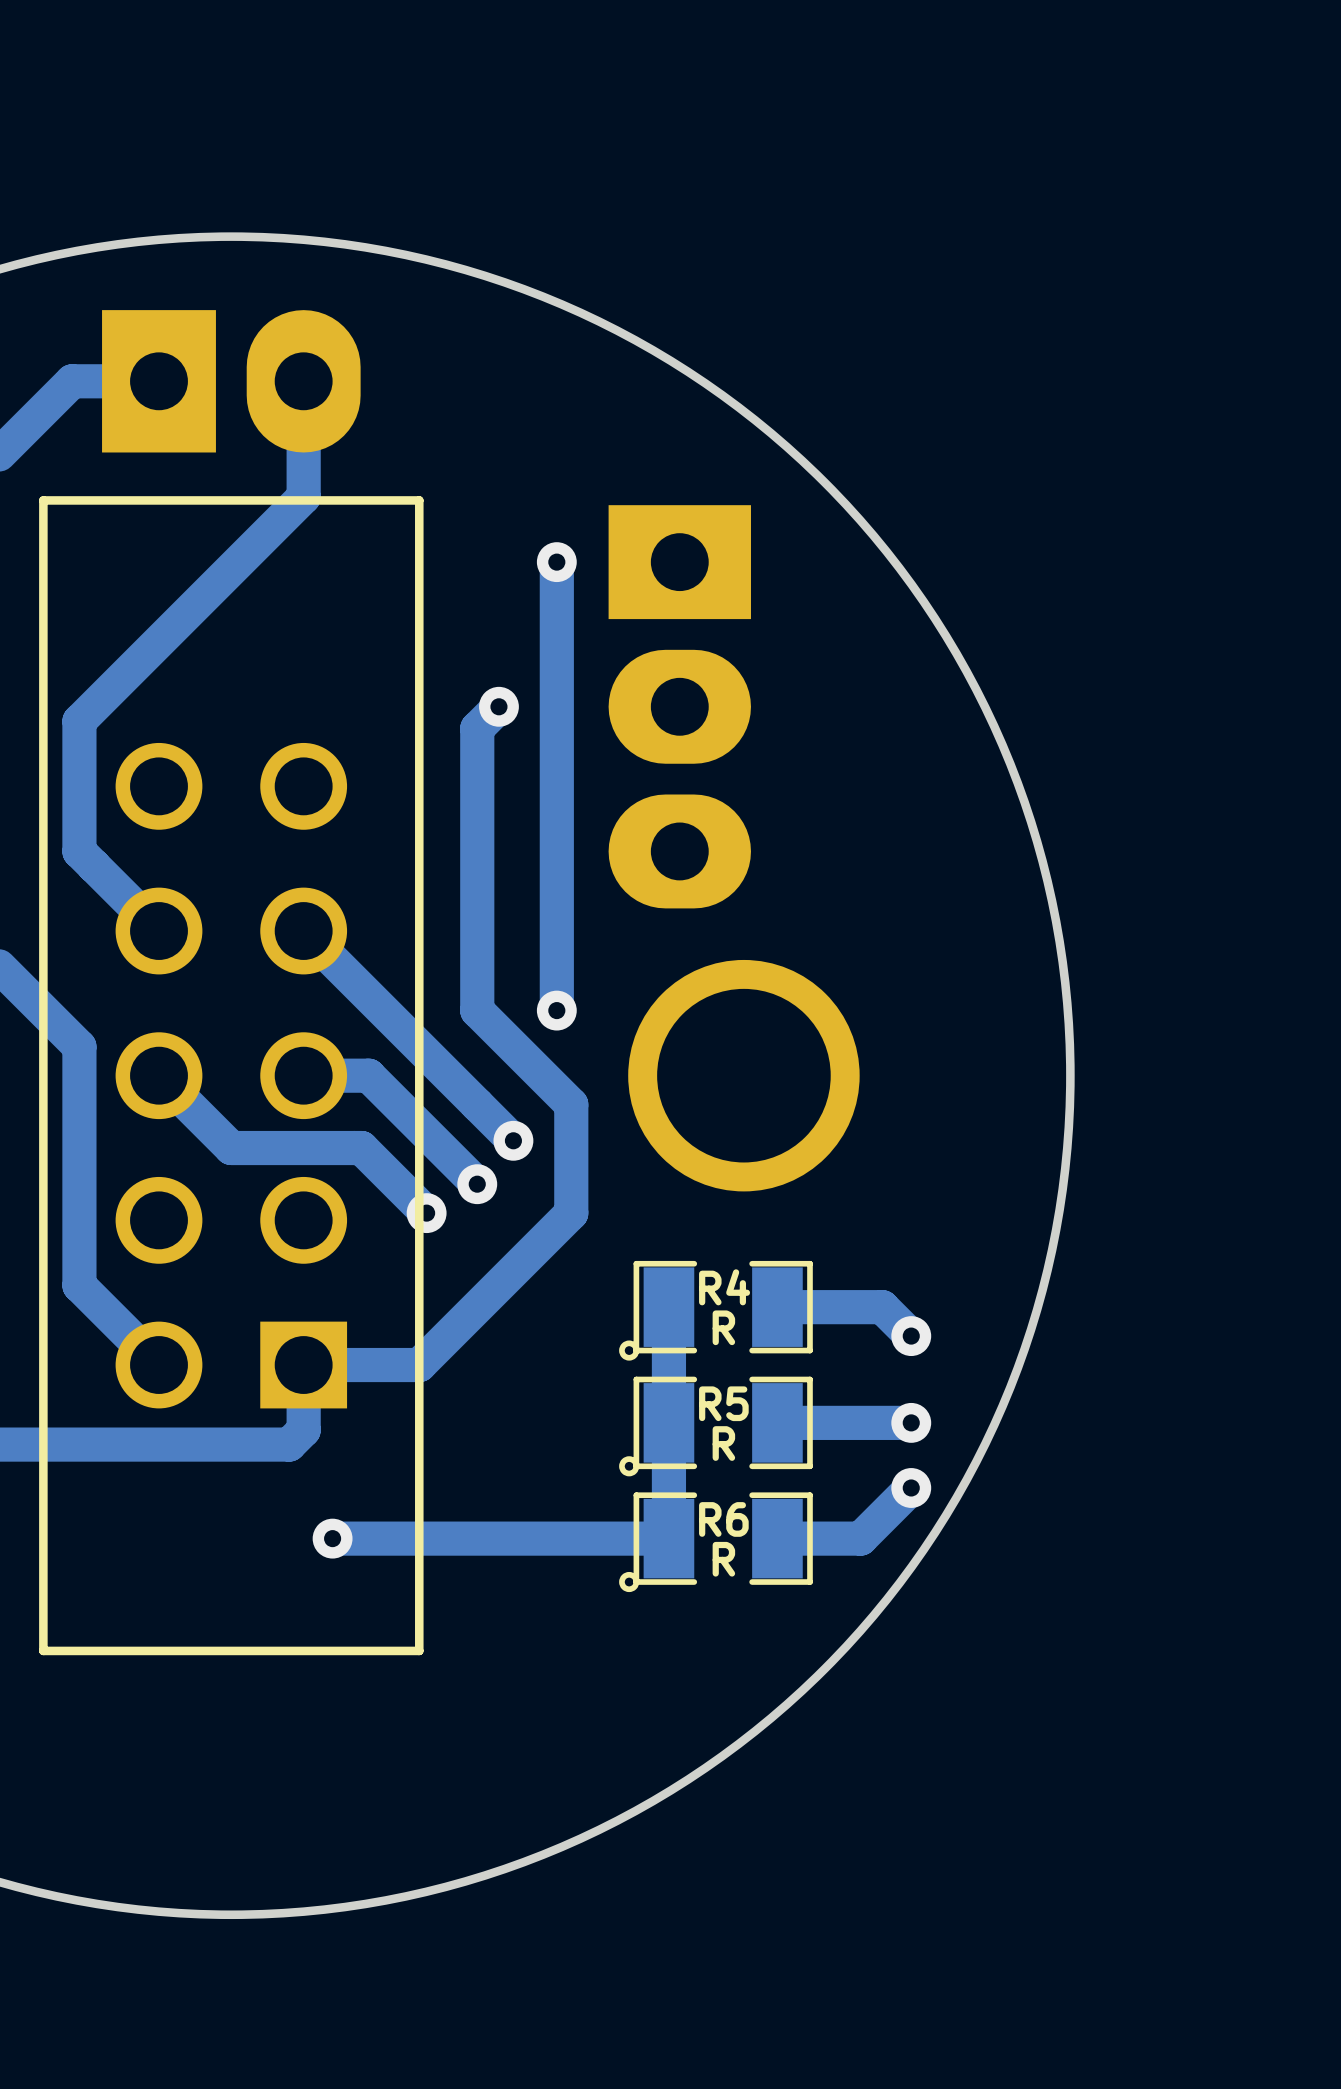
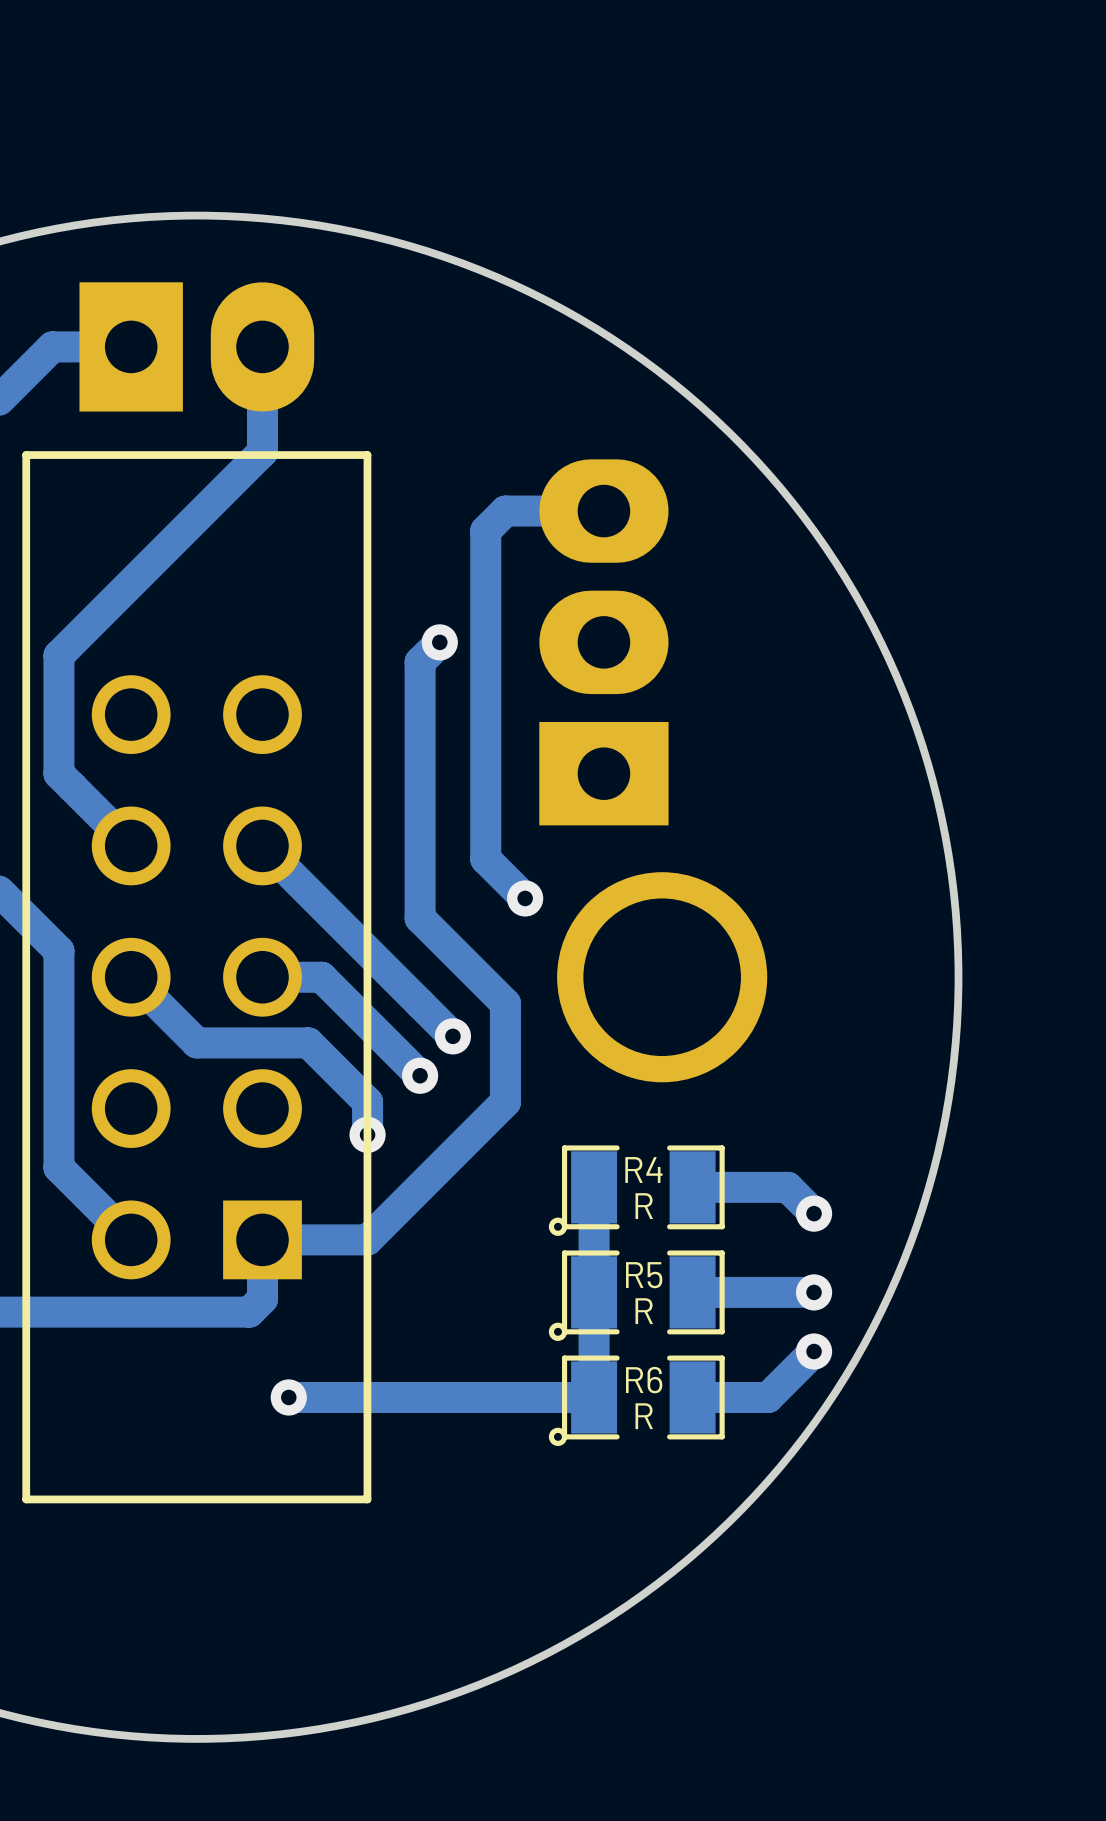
track: (556, 562) (556, 1010) -> none
via: (556, 562) -> none
track: none -> (603, 511) (505, 511) (485, 530) (485, 859) (525, 898)
part rotation: 0° (679, 706) -> 180° (603, 642)
via position: (556, 1010) -> (525, 898)
track: (354, 1148) (361, 1148) (426, 1213) -> (308, 1042) (367, 1102) (367, 1134)
via position: (426, 1213) -> (367, 1134)

